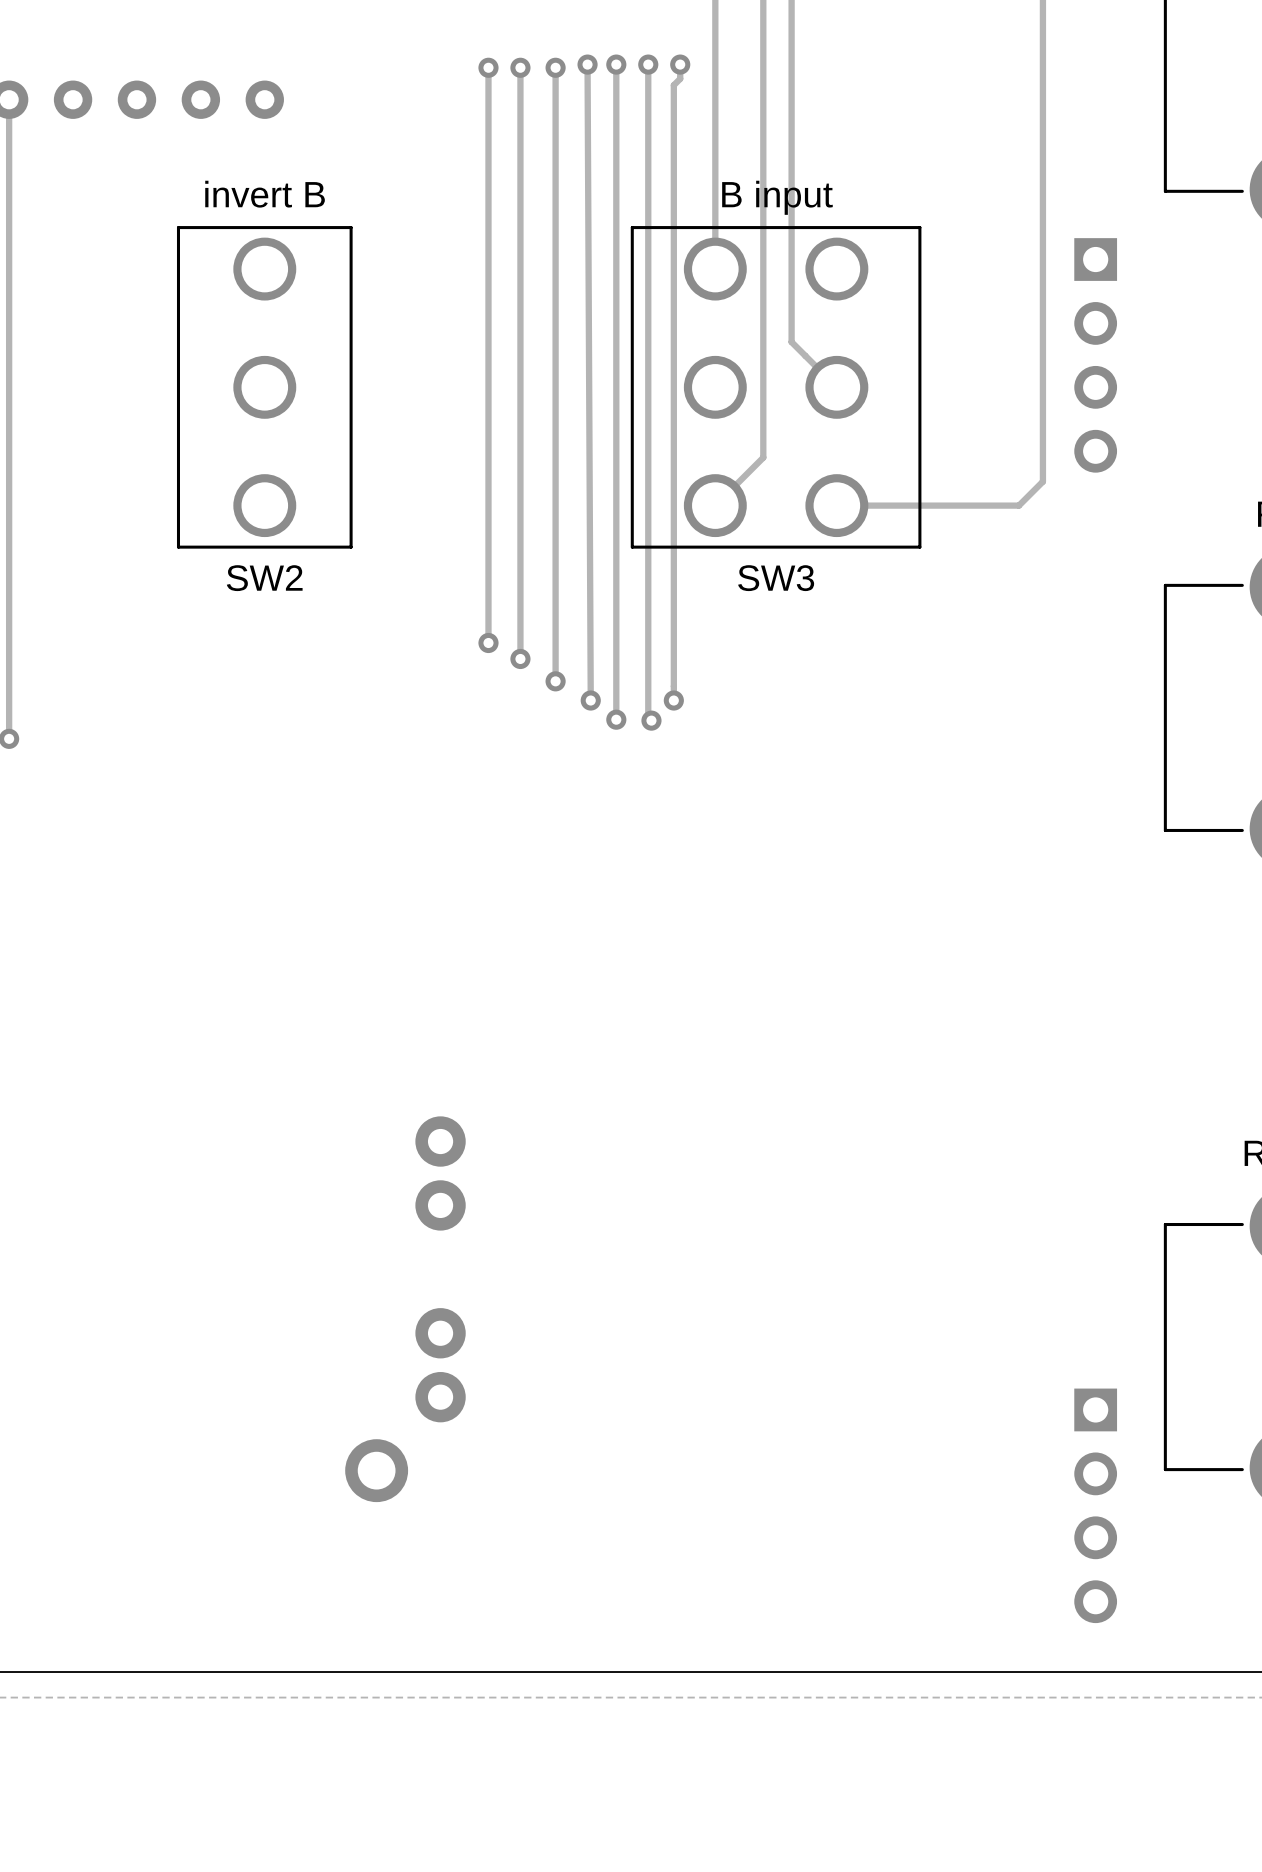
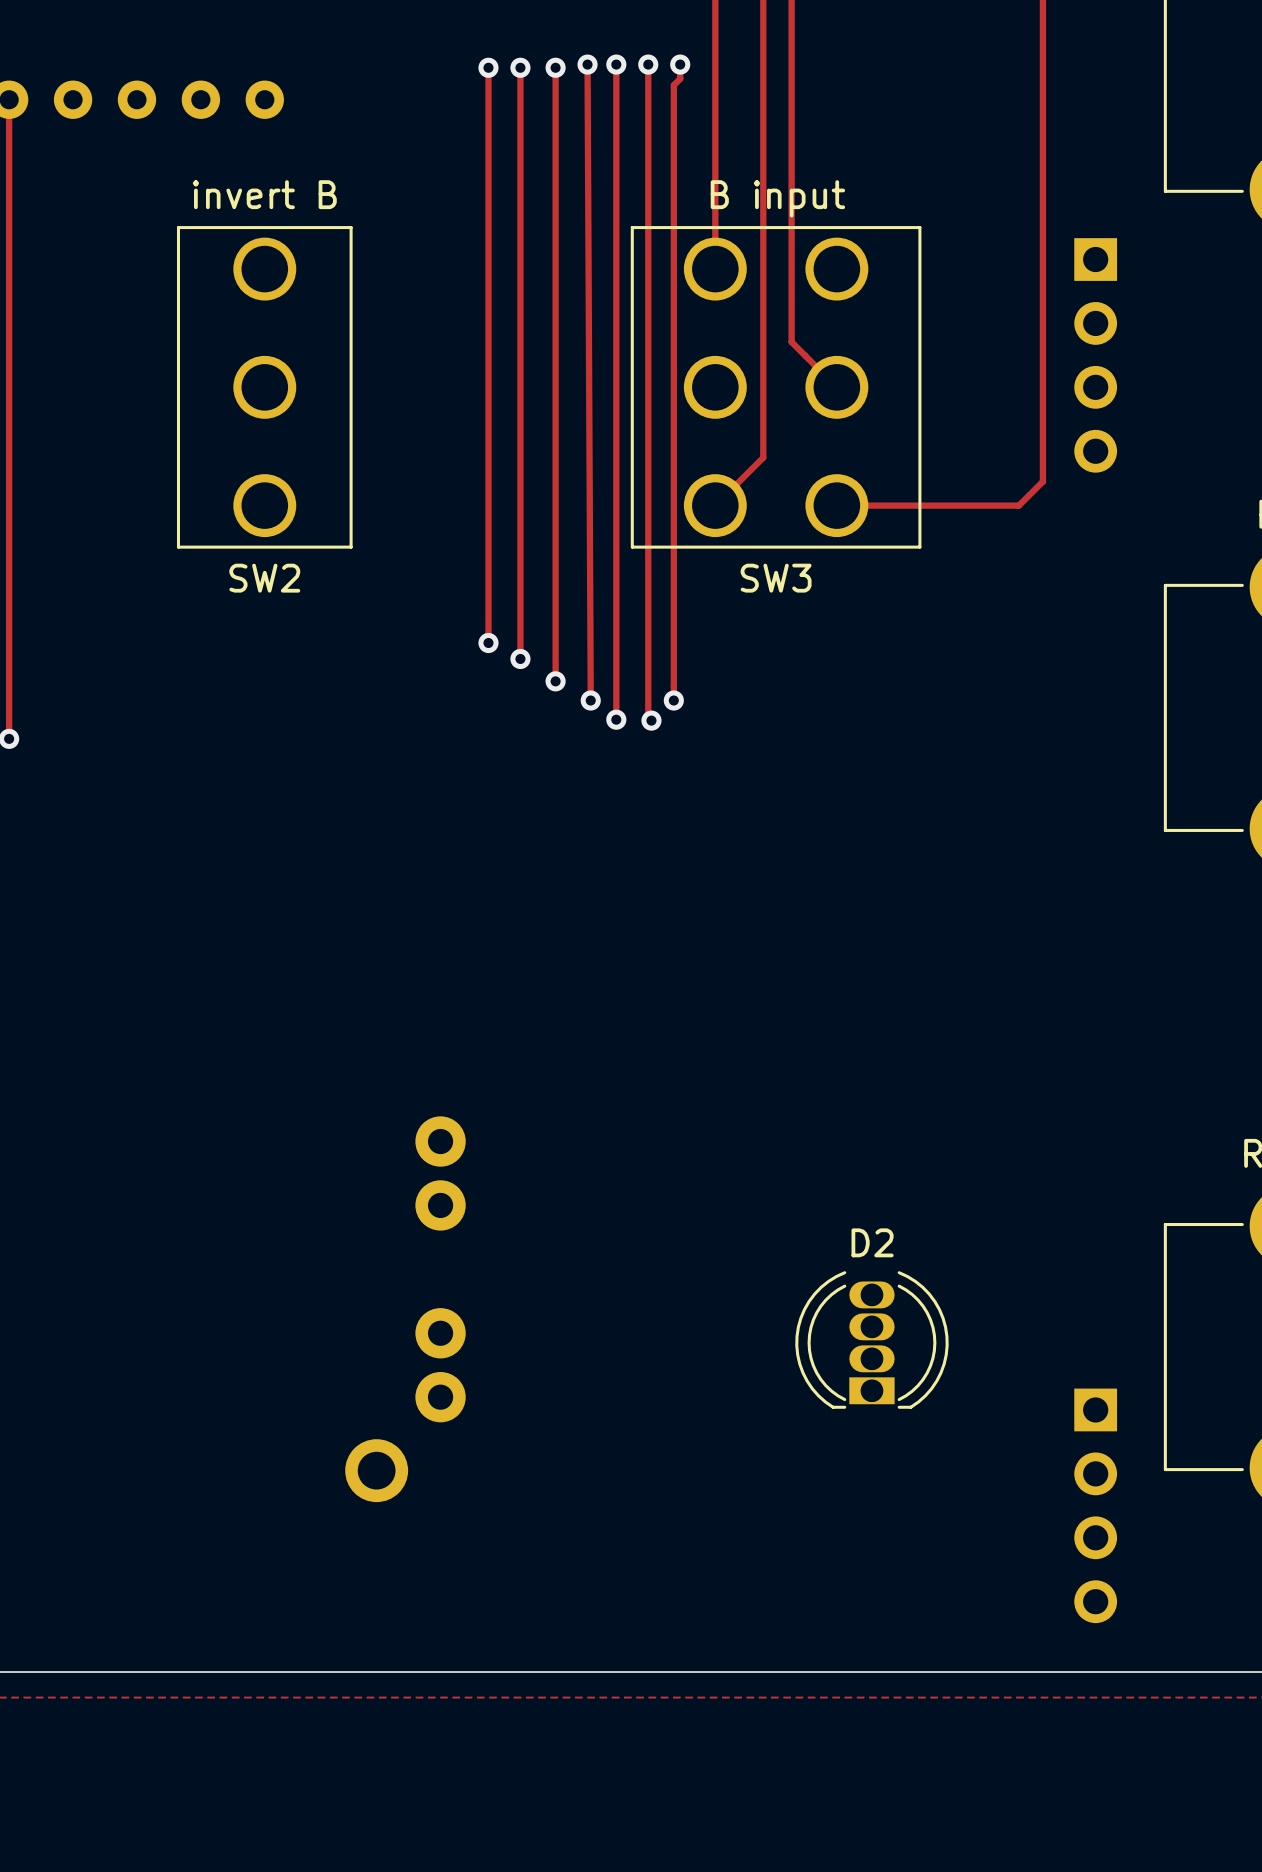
D2: none -> (871, 1339)

